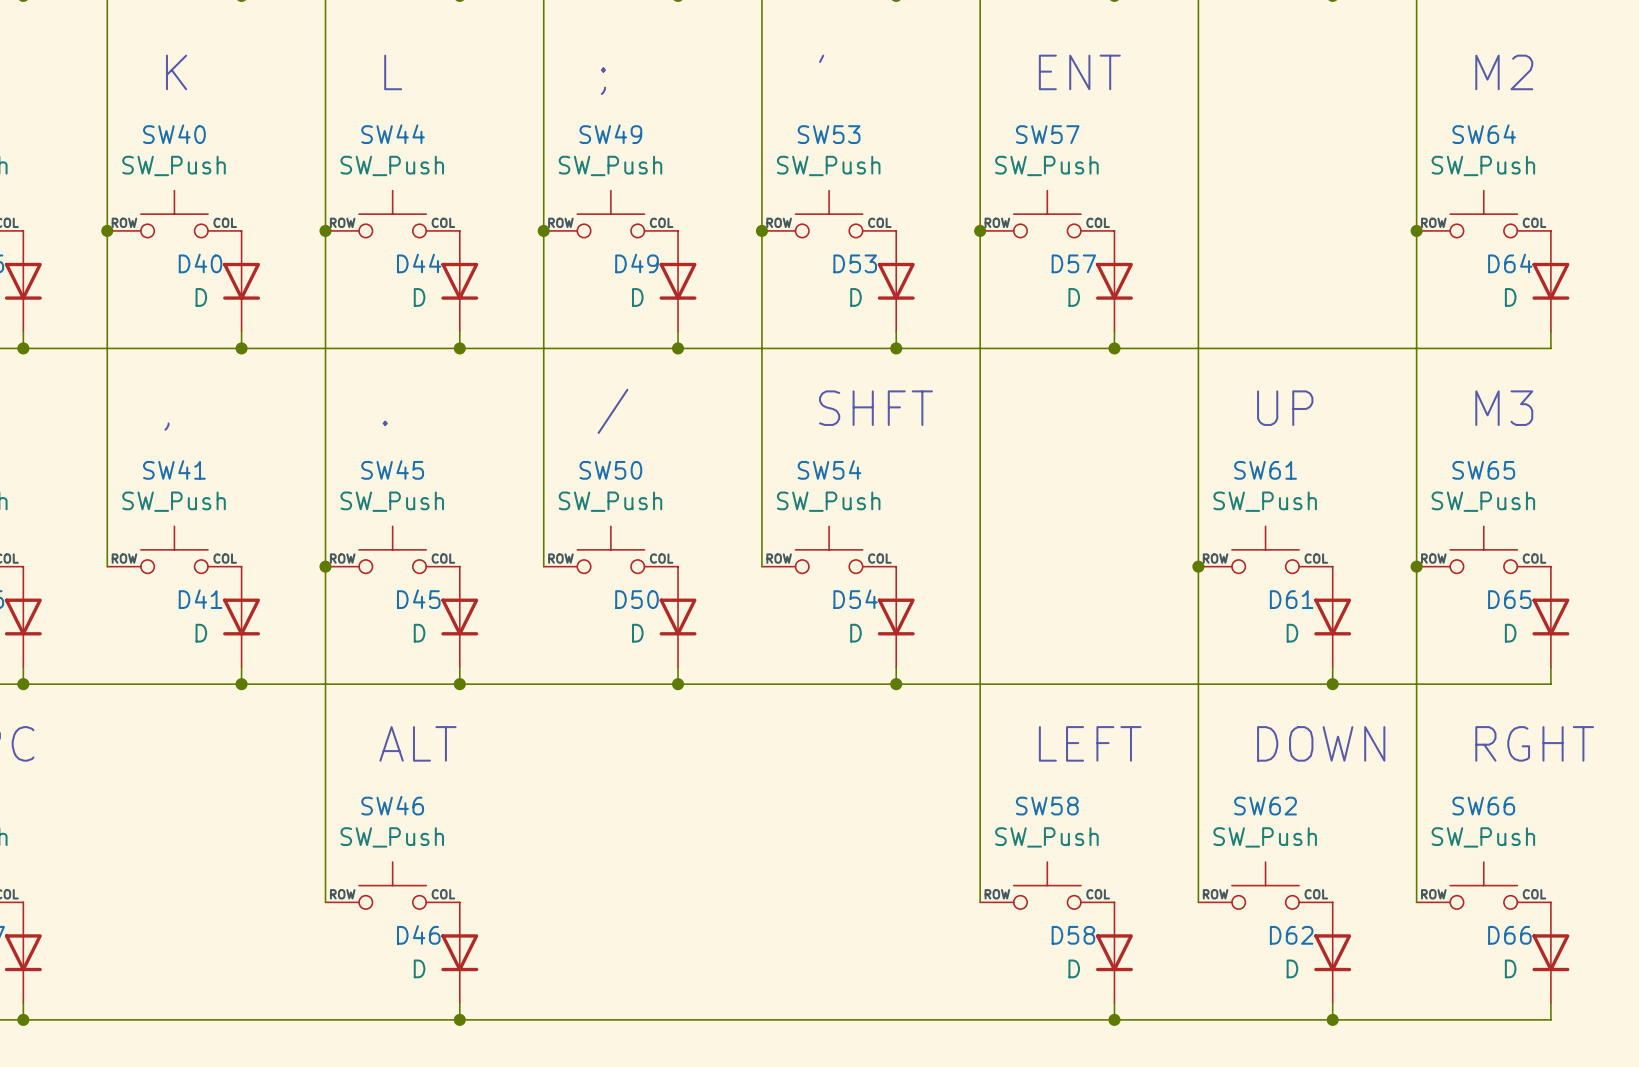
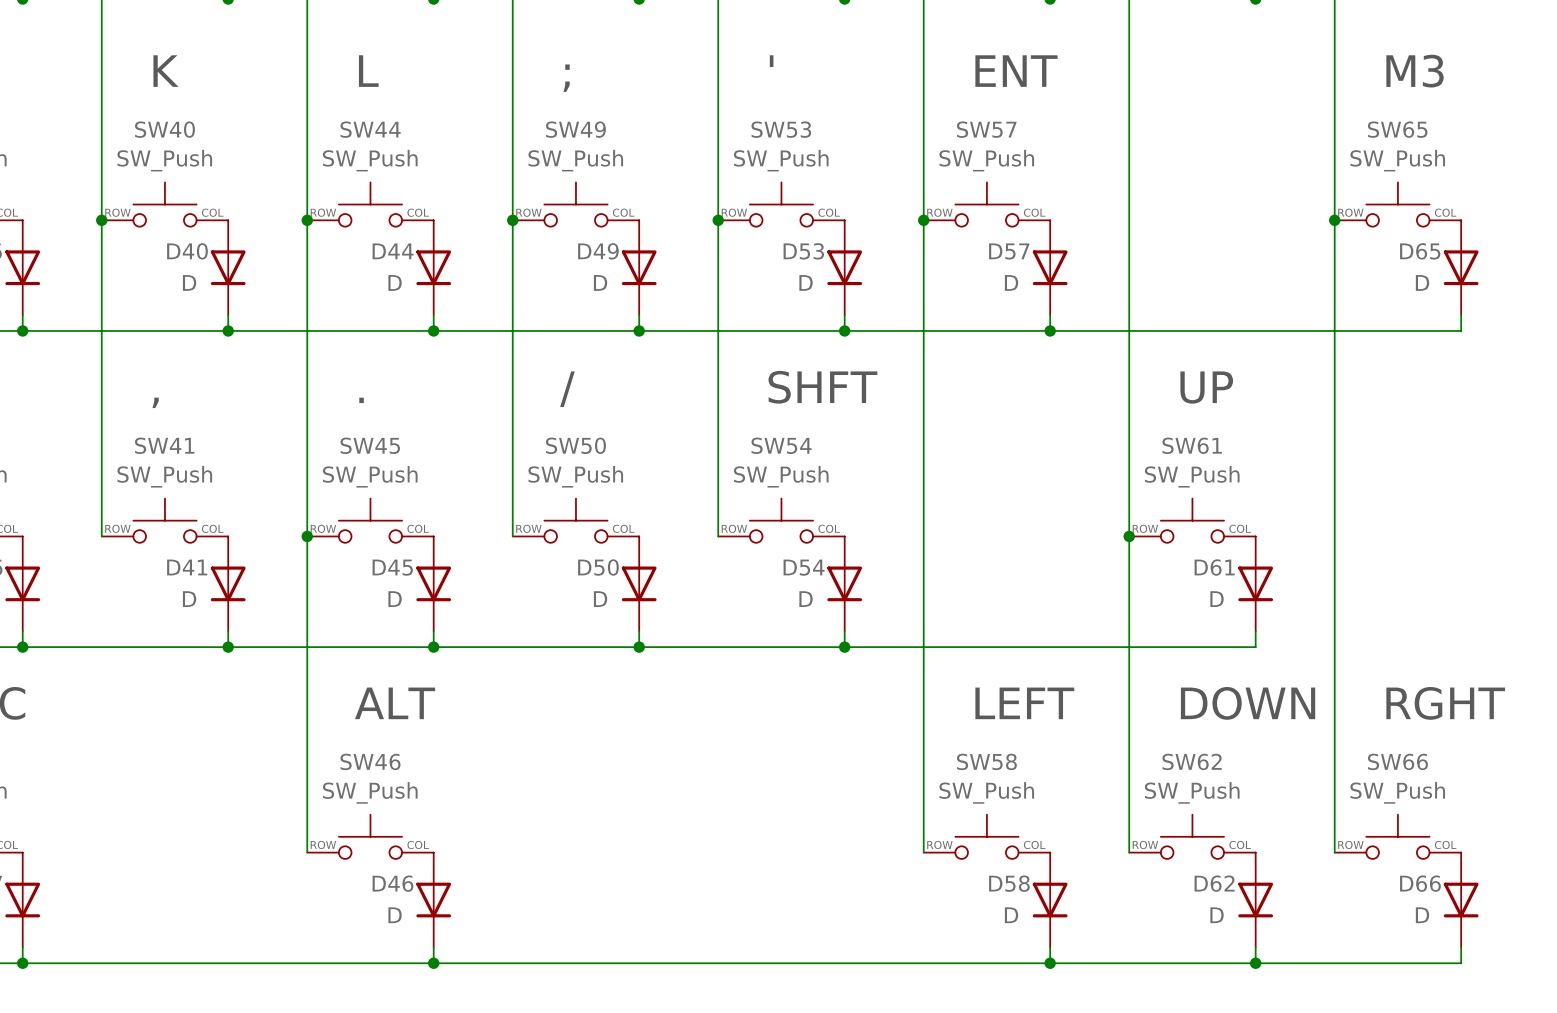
text: M2 (1504, 72) -> M3 (1415, 71)
SW64 name: SW64 (1484, 134) -> SW65 (1397, 129)
D64 name: D64 (1510, 263) -> D65 (1420, 251)
text: M3 (1504, 408) -> none
SW65: SW_Push (1483, 549) -> none
junction: (1416, 566) -> none
D65: D (1550, 617) -> none
wire: (1550, 667) (1550, 684) (1332, 684) -> none
junction: (1332, 684) -> none

